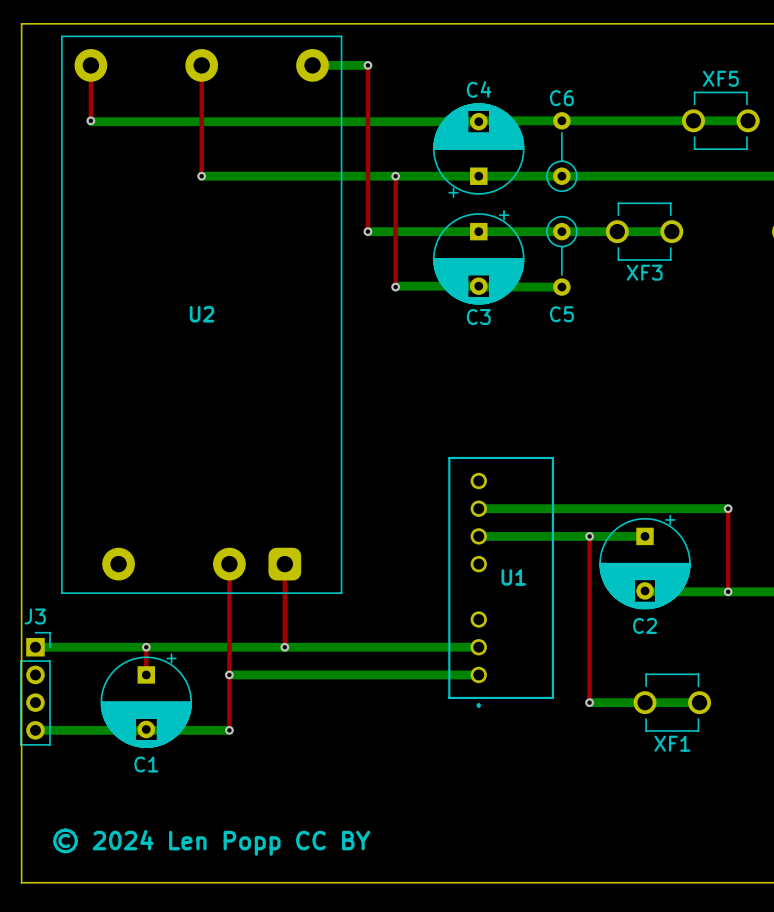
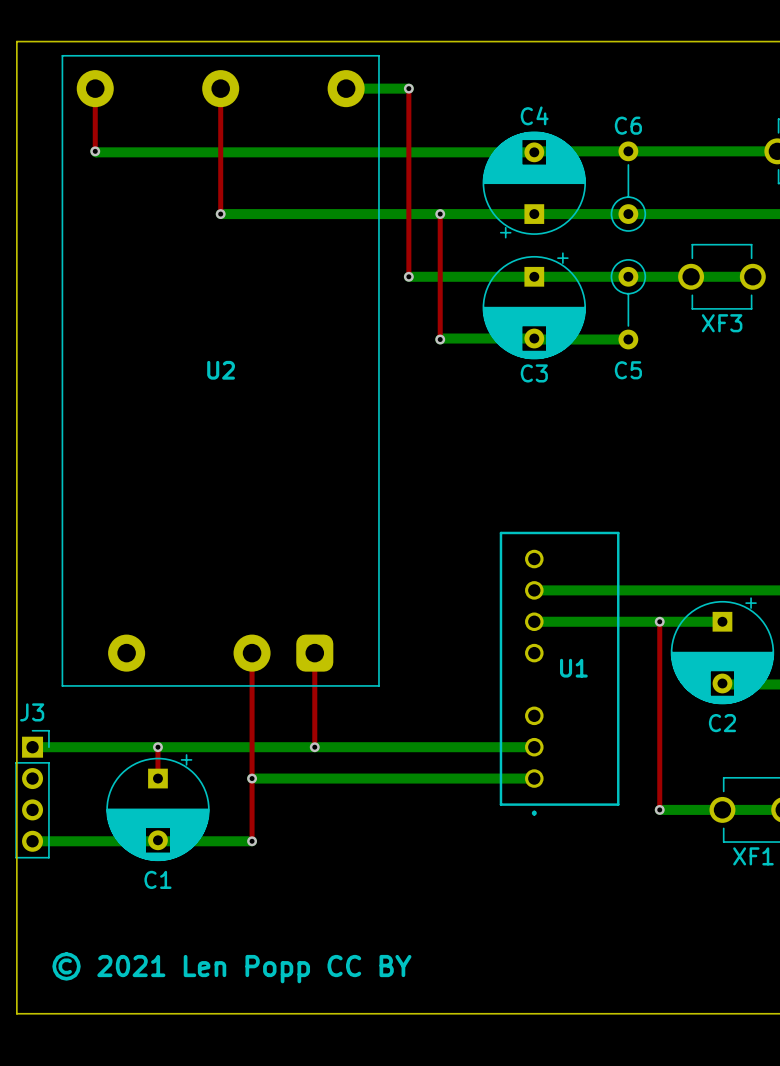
text: © 2024 Len Popp CC BY (211, 842) -> © 2021 Len Popp CC BY (231, 967)

